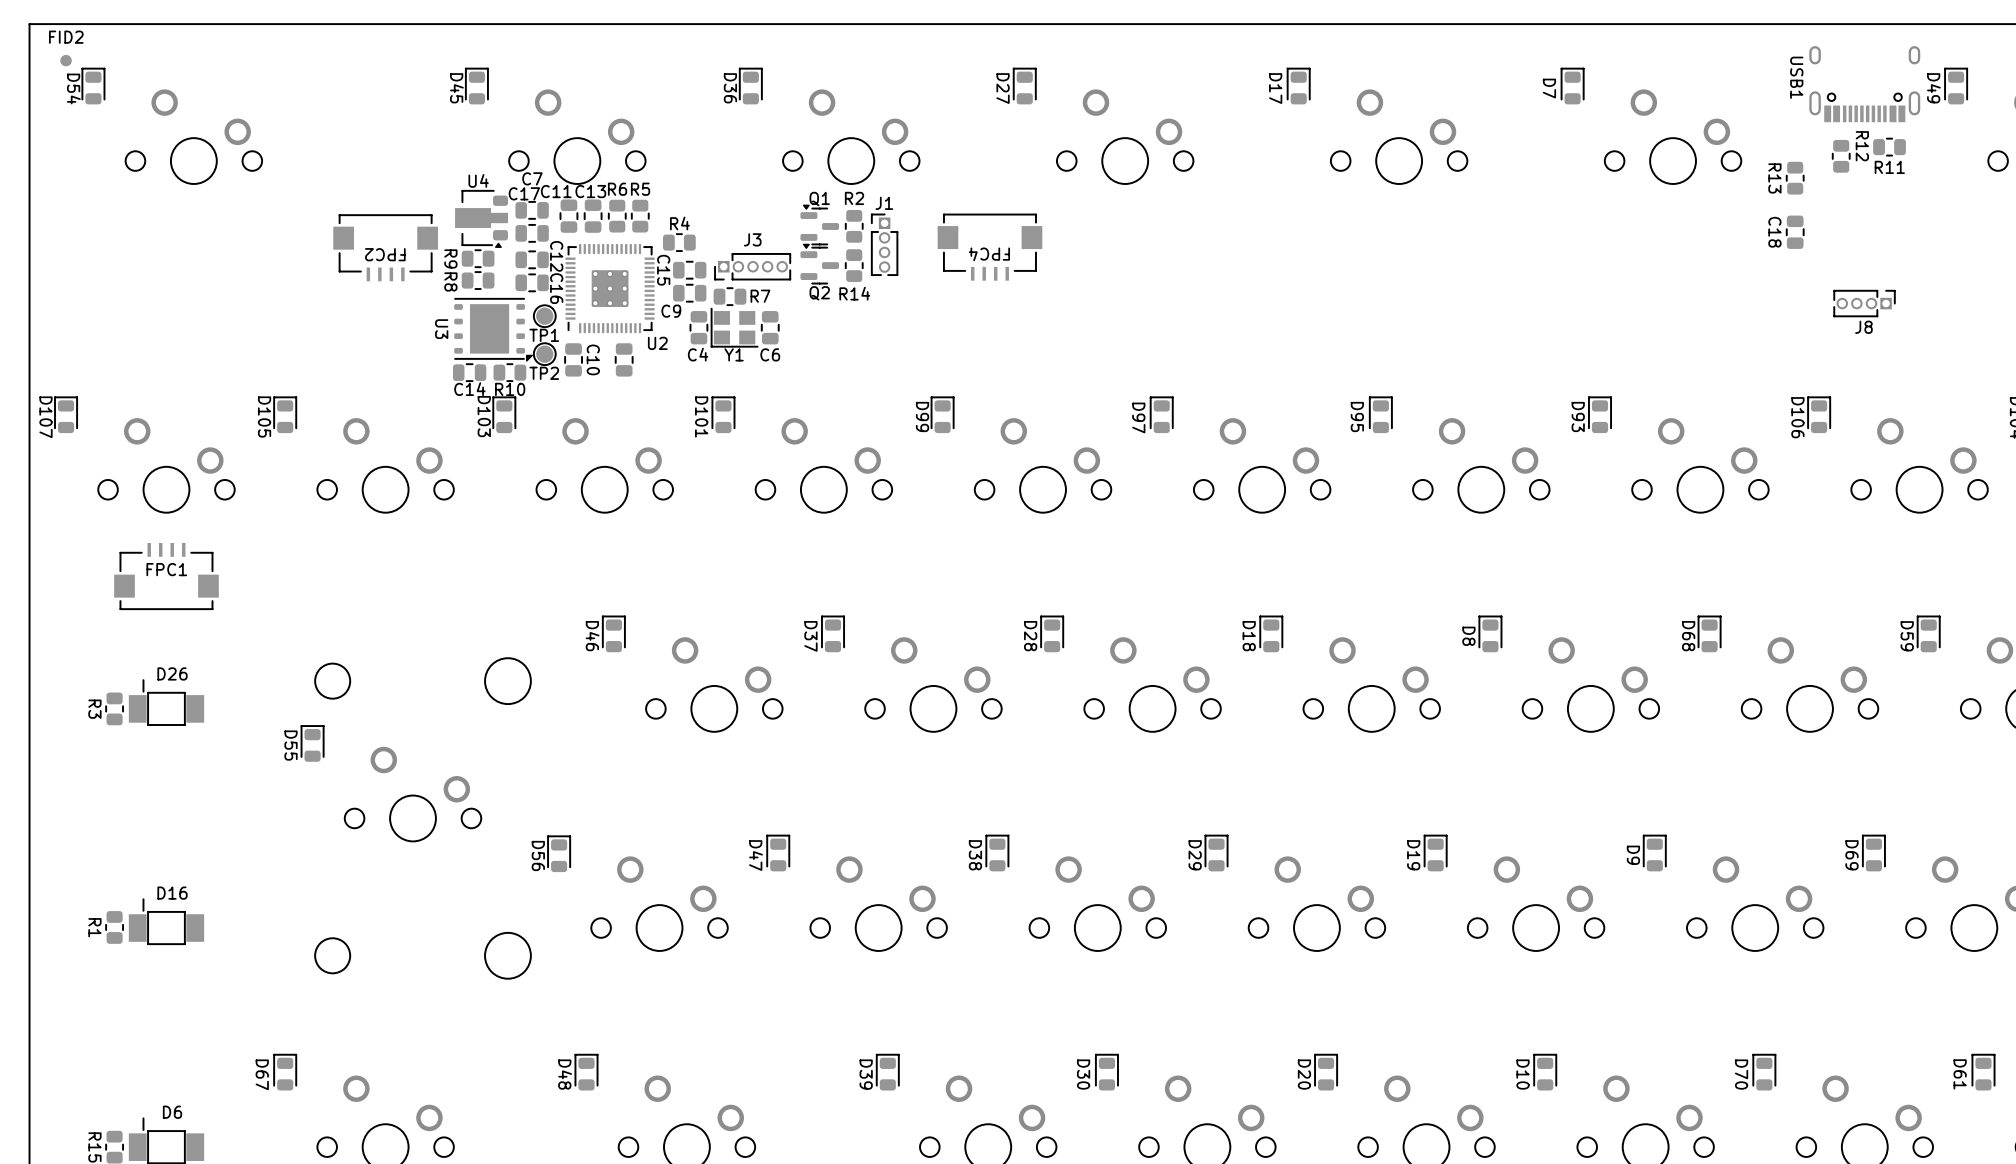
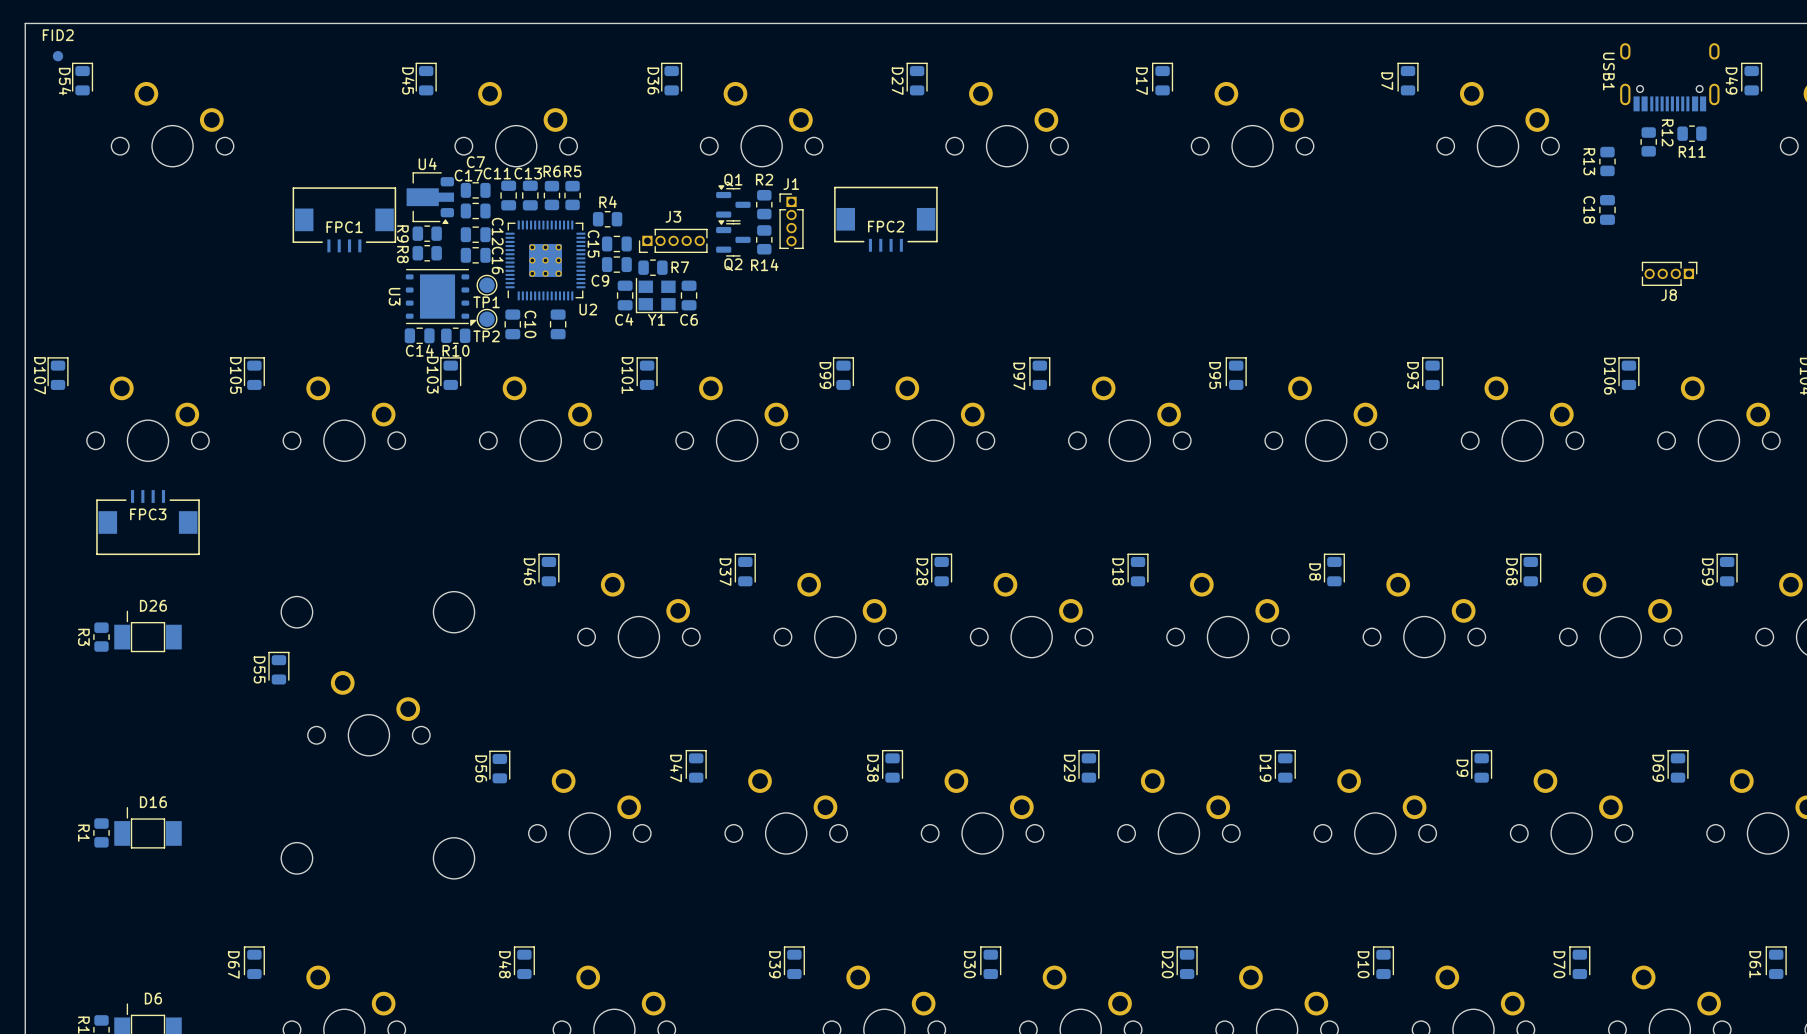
FPC2 footprint: [333, 214, 438, 282] -> [834, 186, 938, 252]
FPC4: (989, 247) -> none
FPC1 footprint: [114, 543, 219, 611] -> [292, 187, 397, 253]
FPC3: none -> (148, 522)

